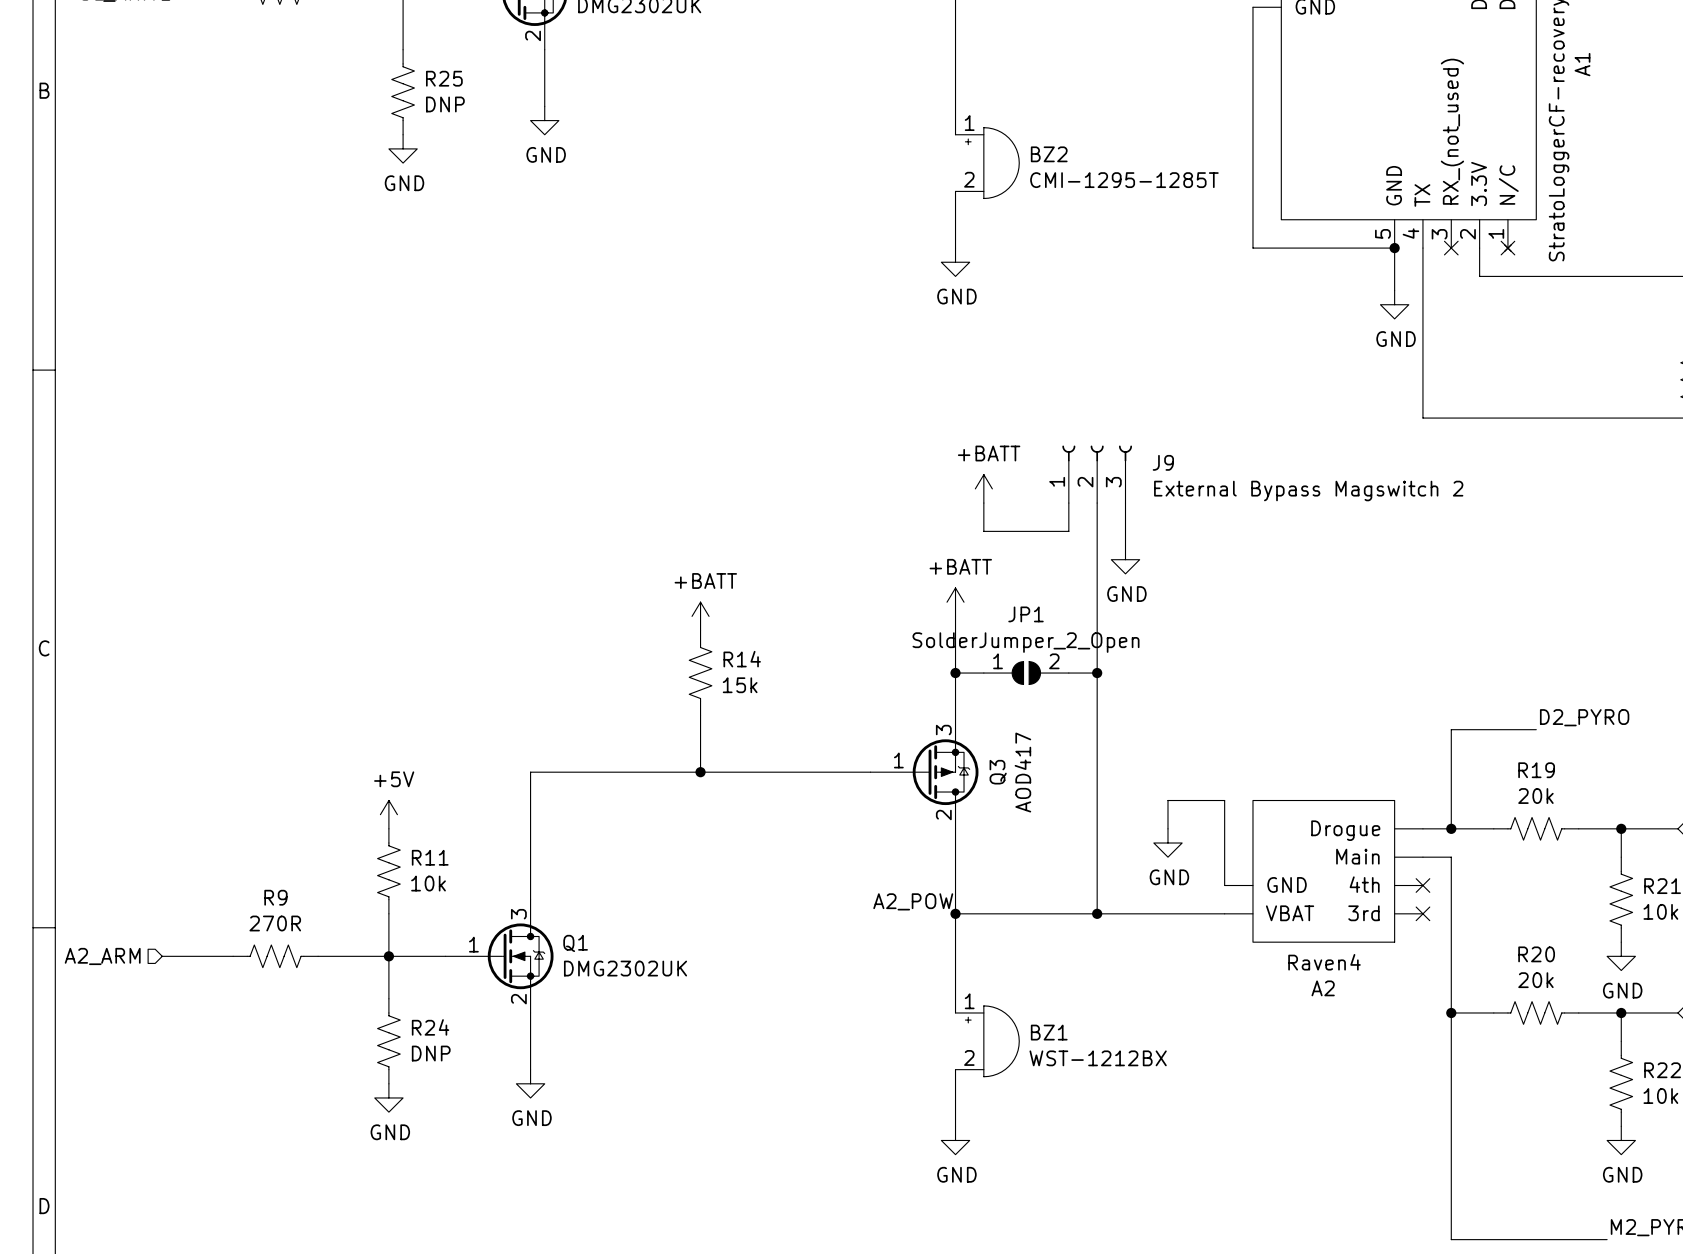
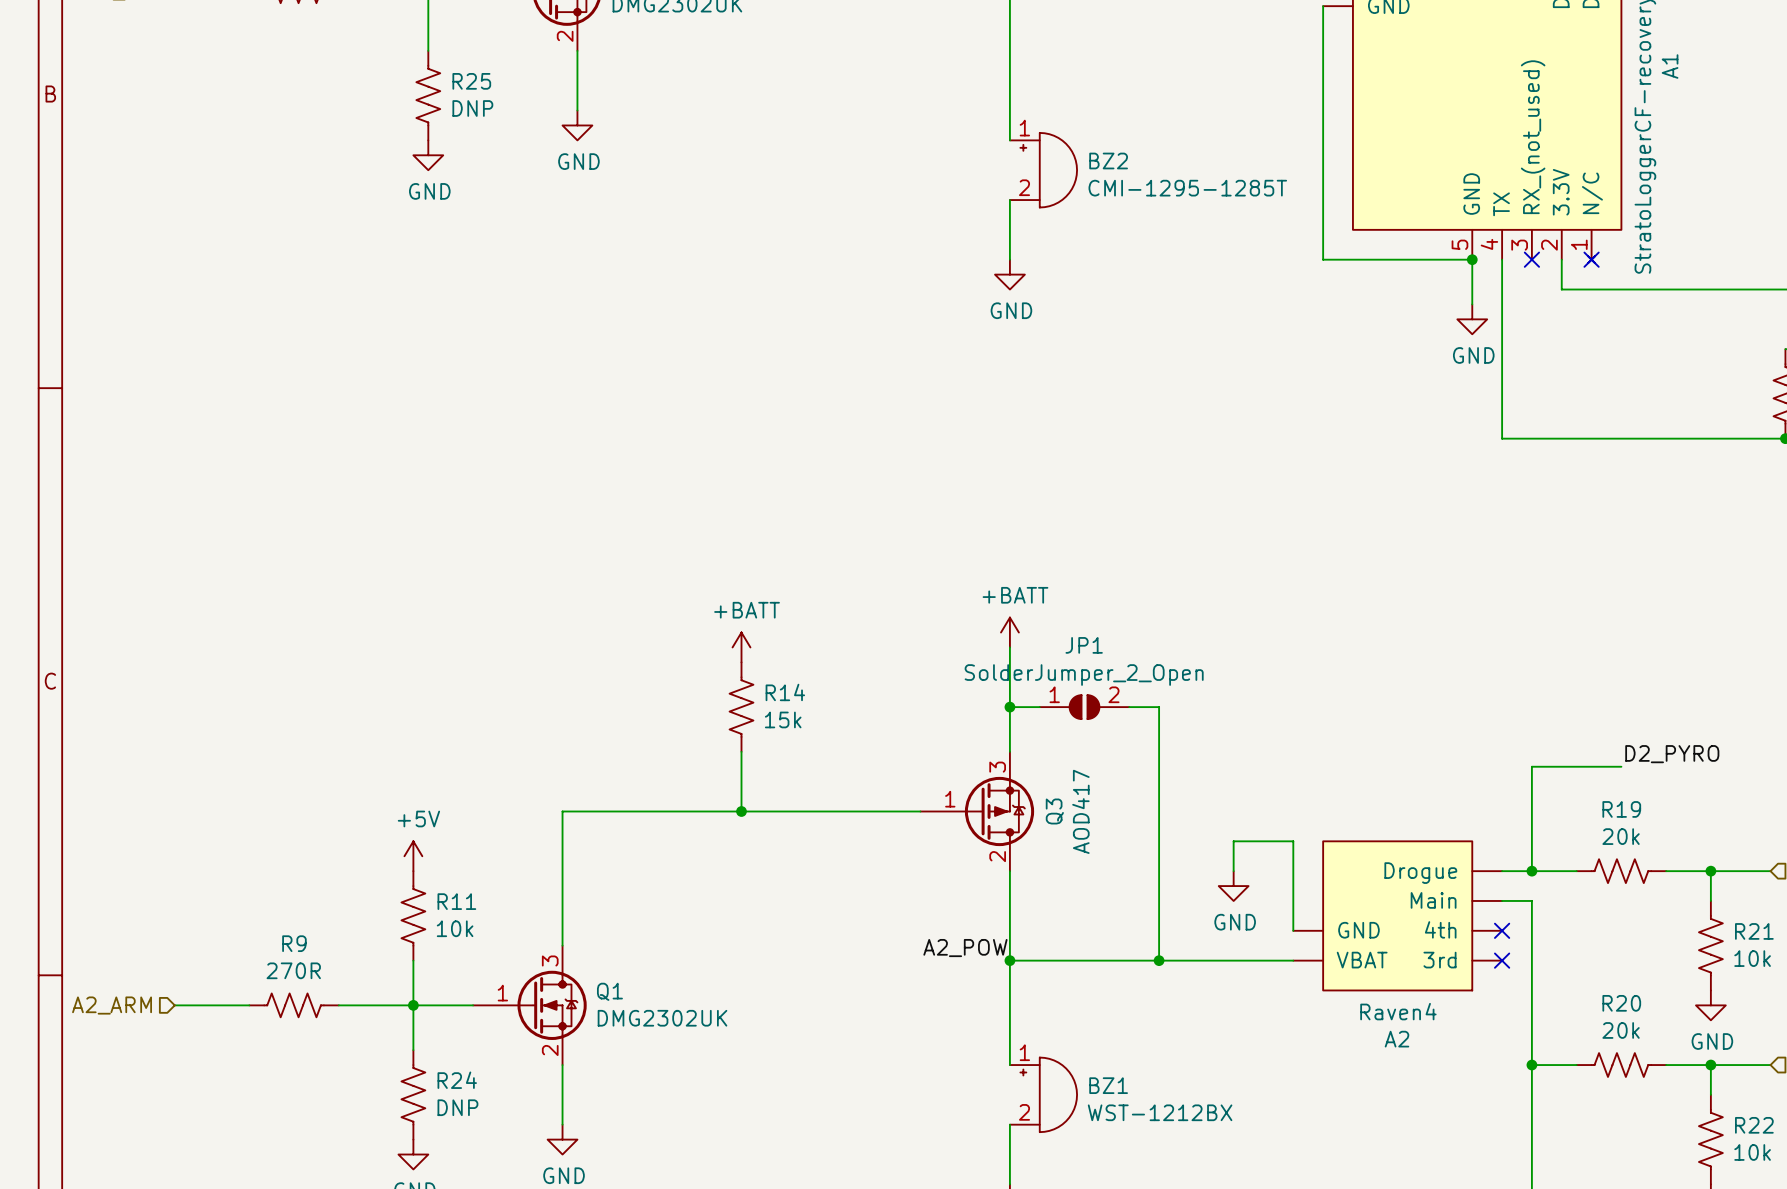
J9: External Bypass Magswitch 2 (1097, 474) -> none
power symbol: +BATT (983, 488) -> none
wire: (983, 503) (983, 531) (1068, 531) (1068, 503) -> none
wire: (1097, 503) (1097, 673) -> none
wire: (1125, 503) (1125, 545) -> none
power symbol: GND (1125, 559) -> none
junction: (1097, 673) -> none

